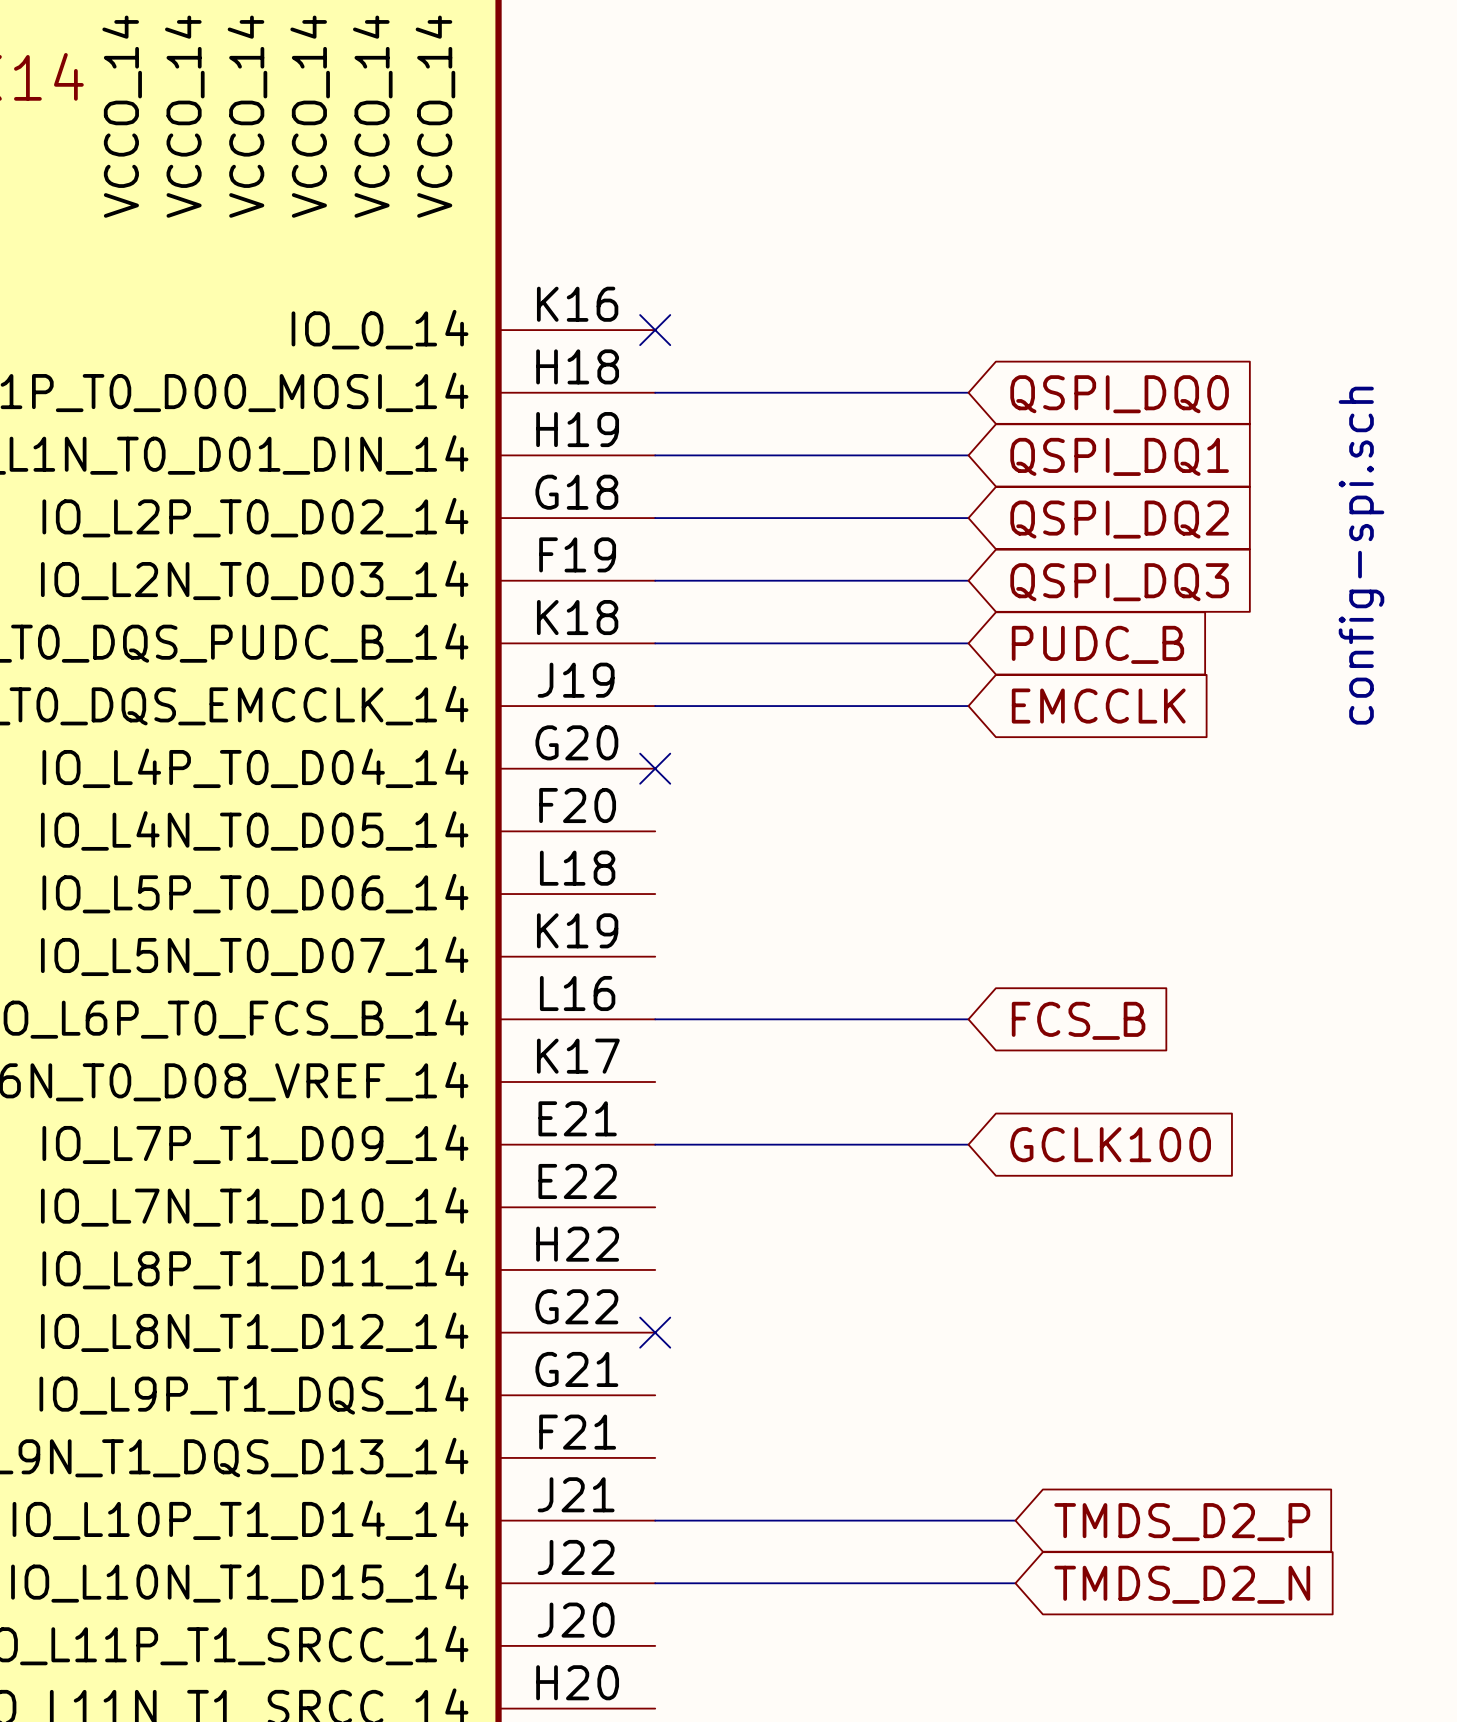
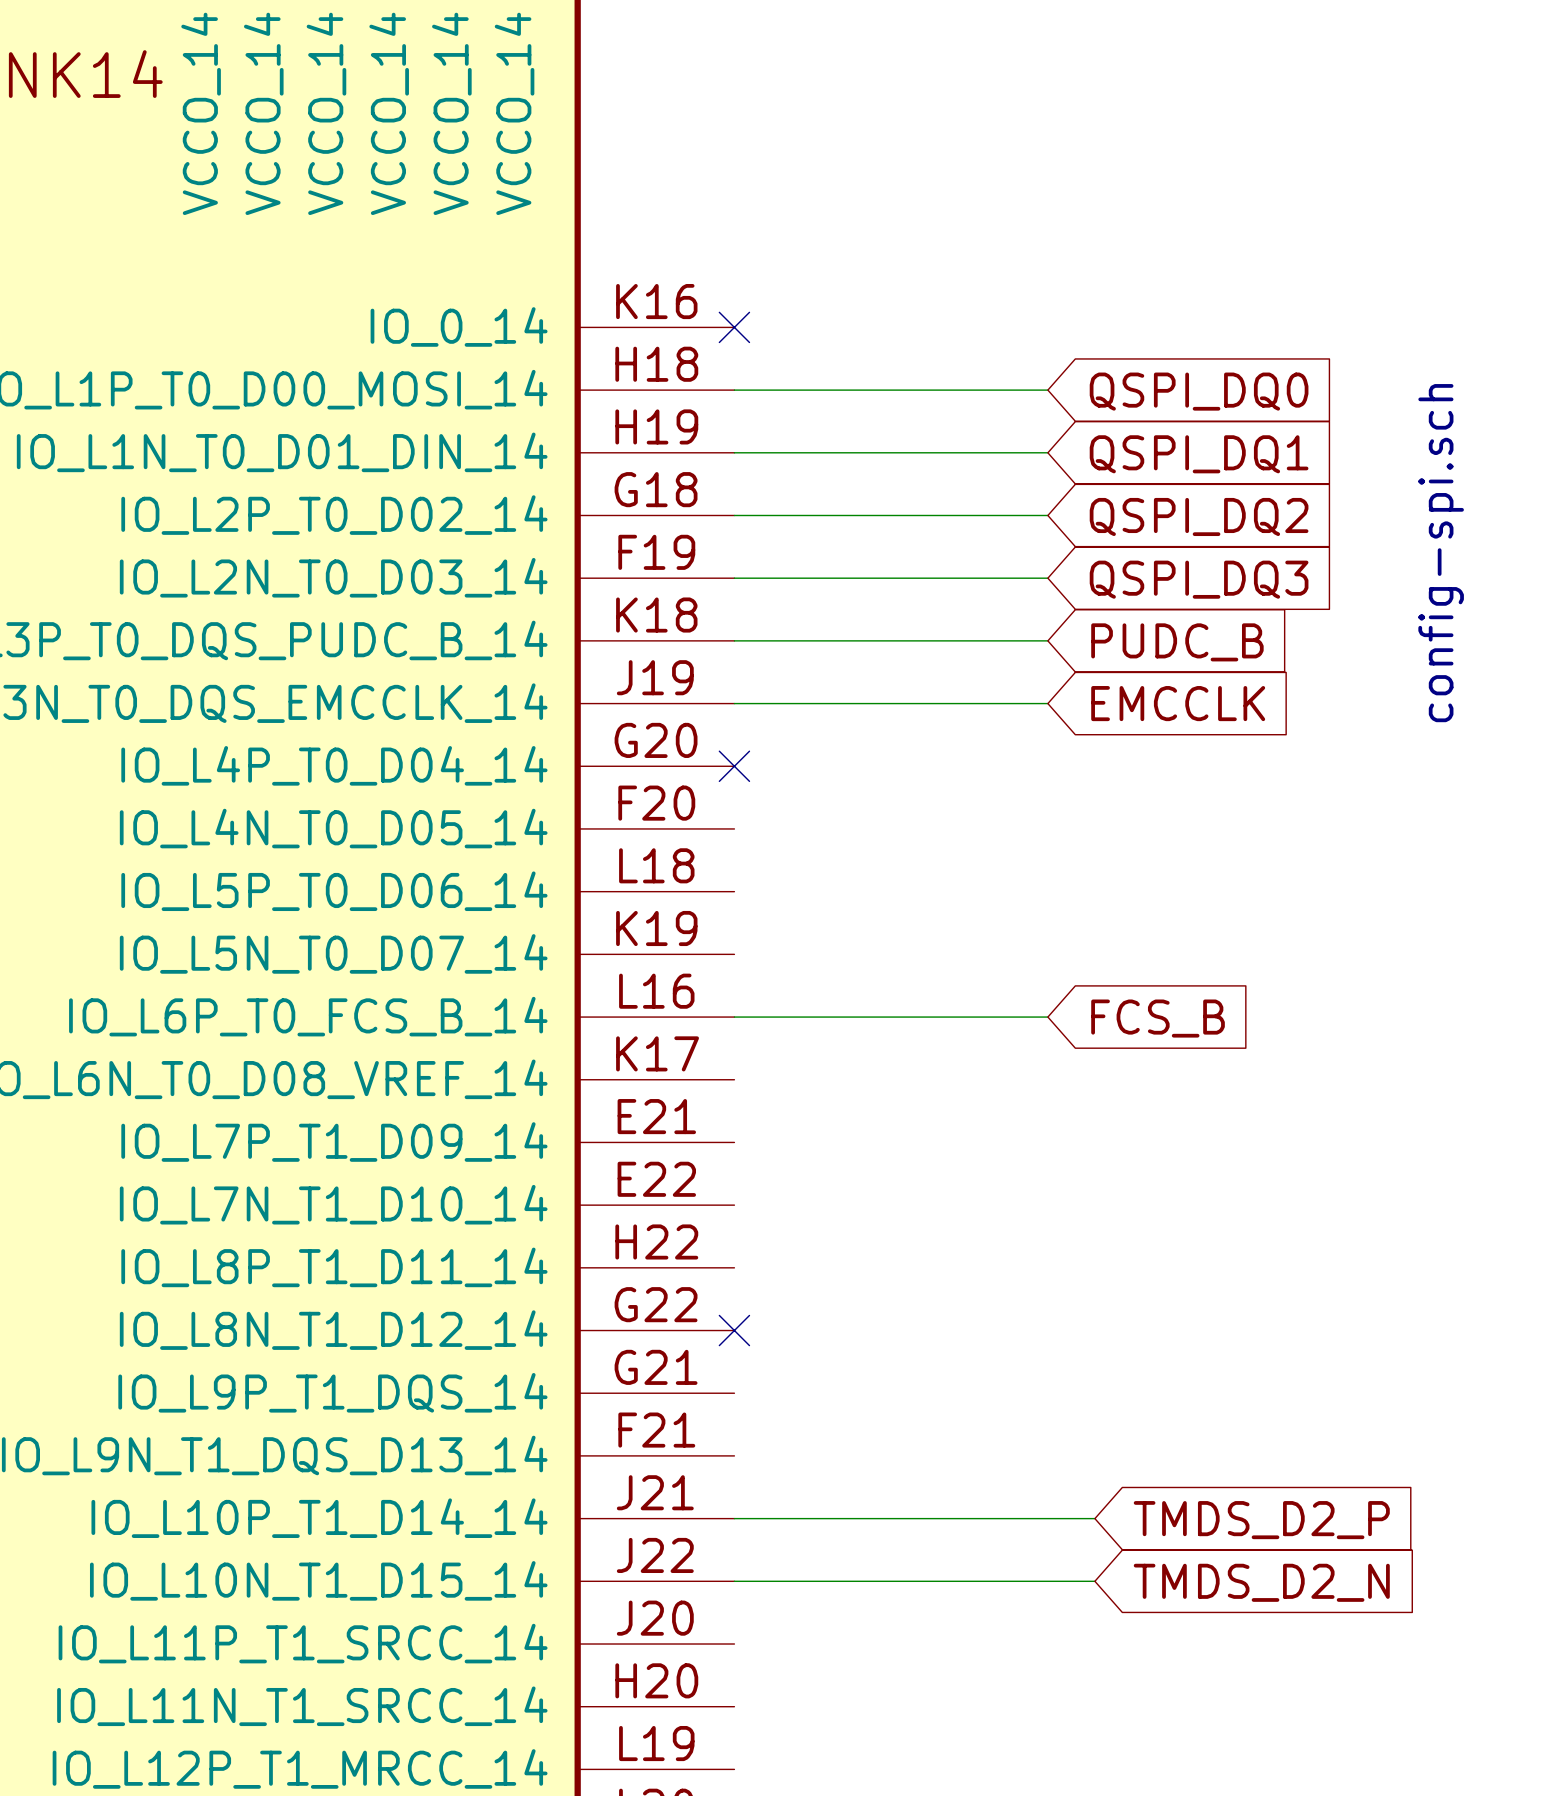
wire: (655, 1144) (968, 1144) -> none
global label: GCLK100 (1110, 1144) -> none

